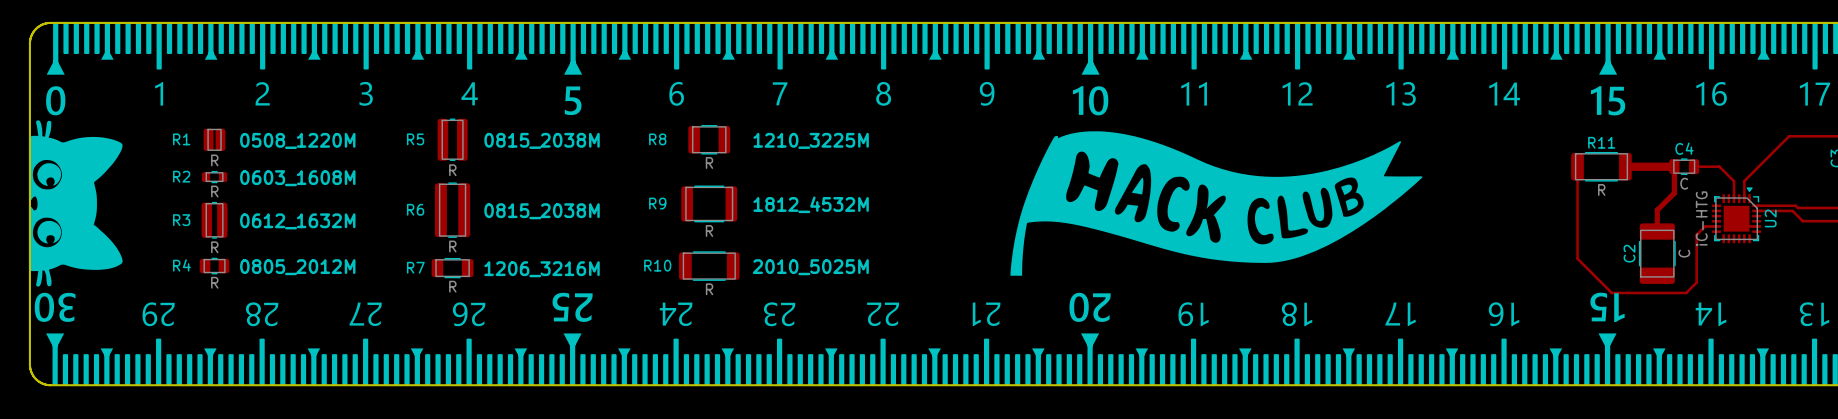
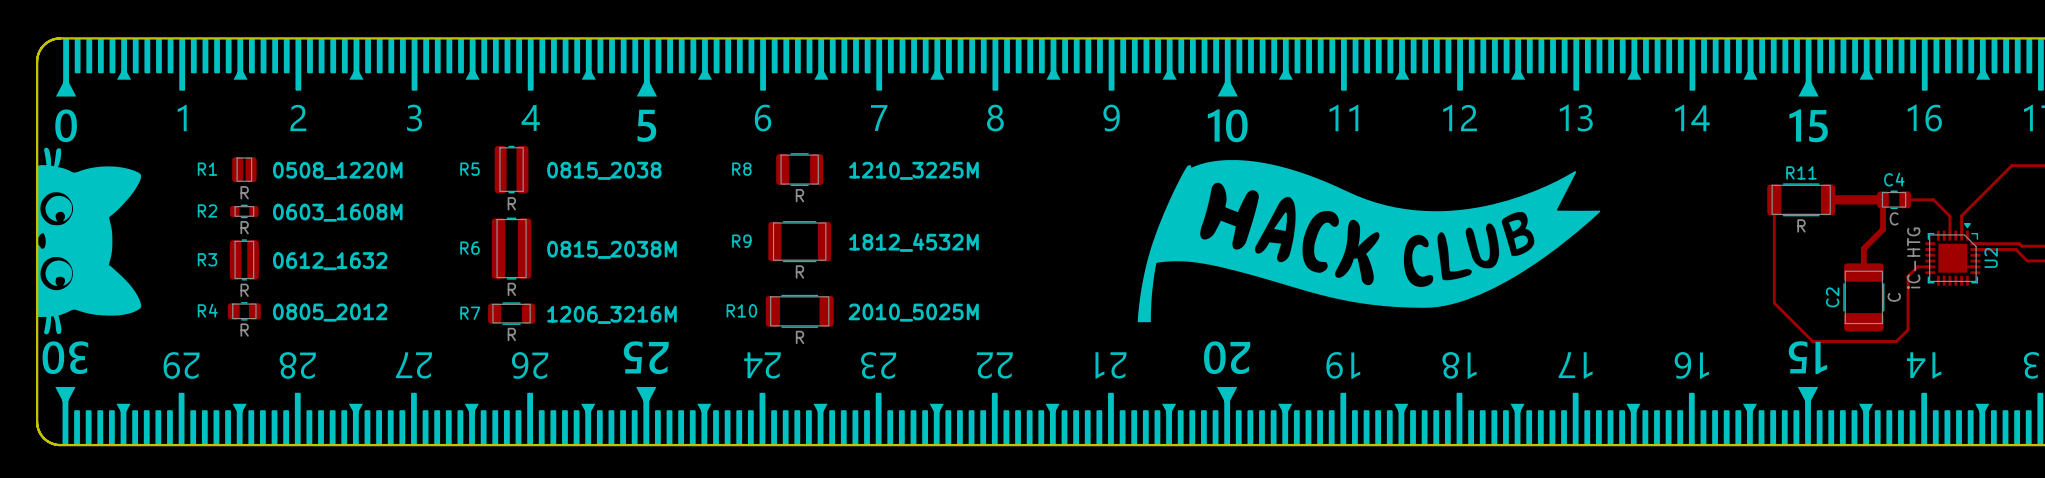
text: 0815_2038M (542, 140) -> 0815_2038 (604, 170)
text: 0612_1632M (297, 221) -> 0612_1632 (330, 261)
text: 0805_2012M (297, 267) -> 0805_2012 (330, 312)

